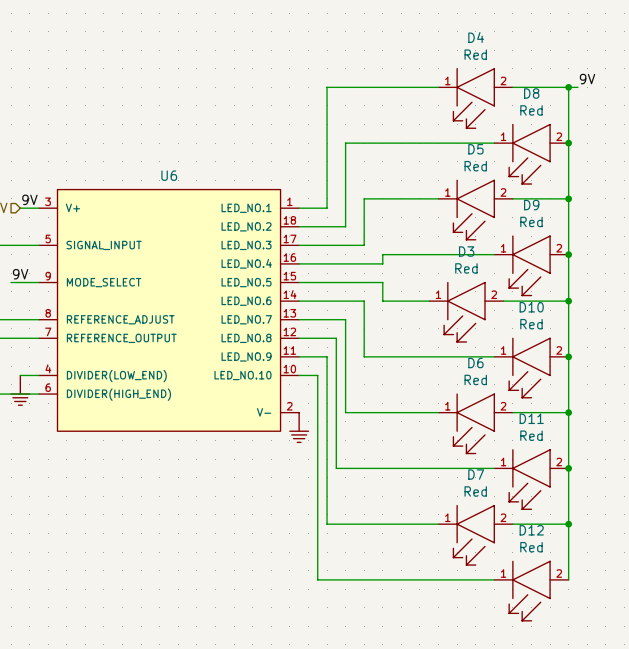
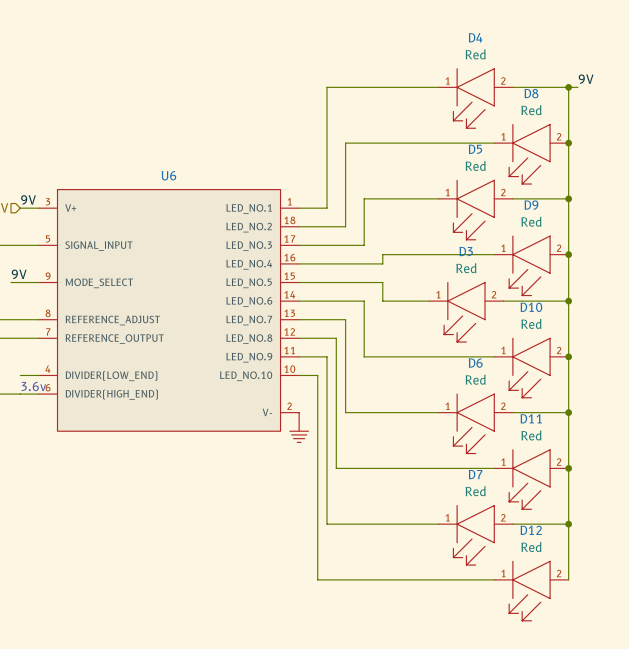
text: none -> 3.6v (33, 386)
power symbol: (20, 390) -> none

